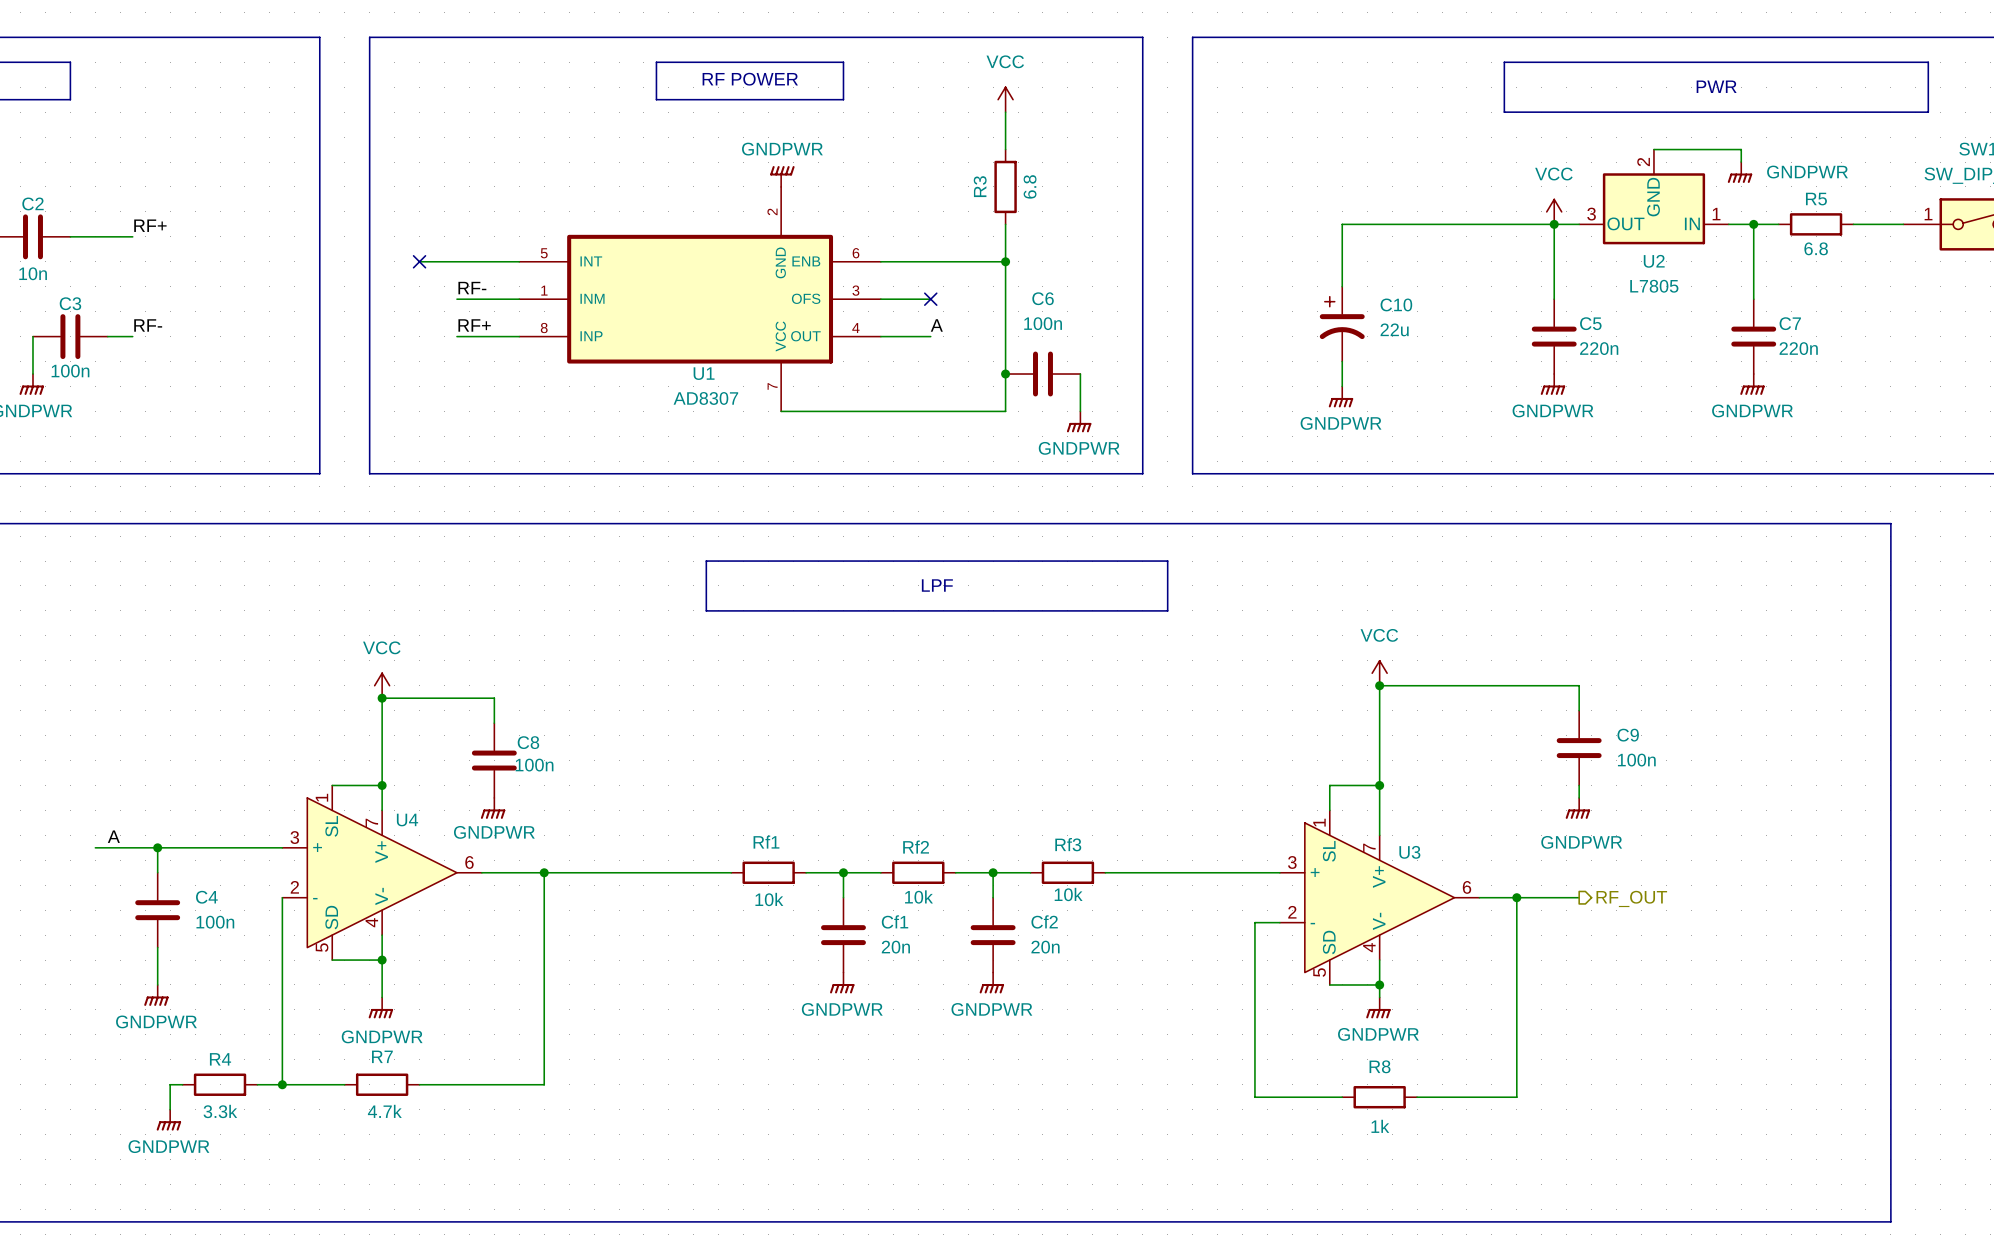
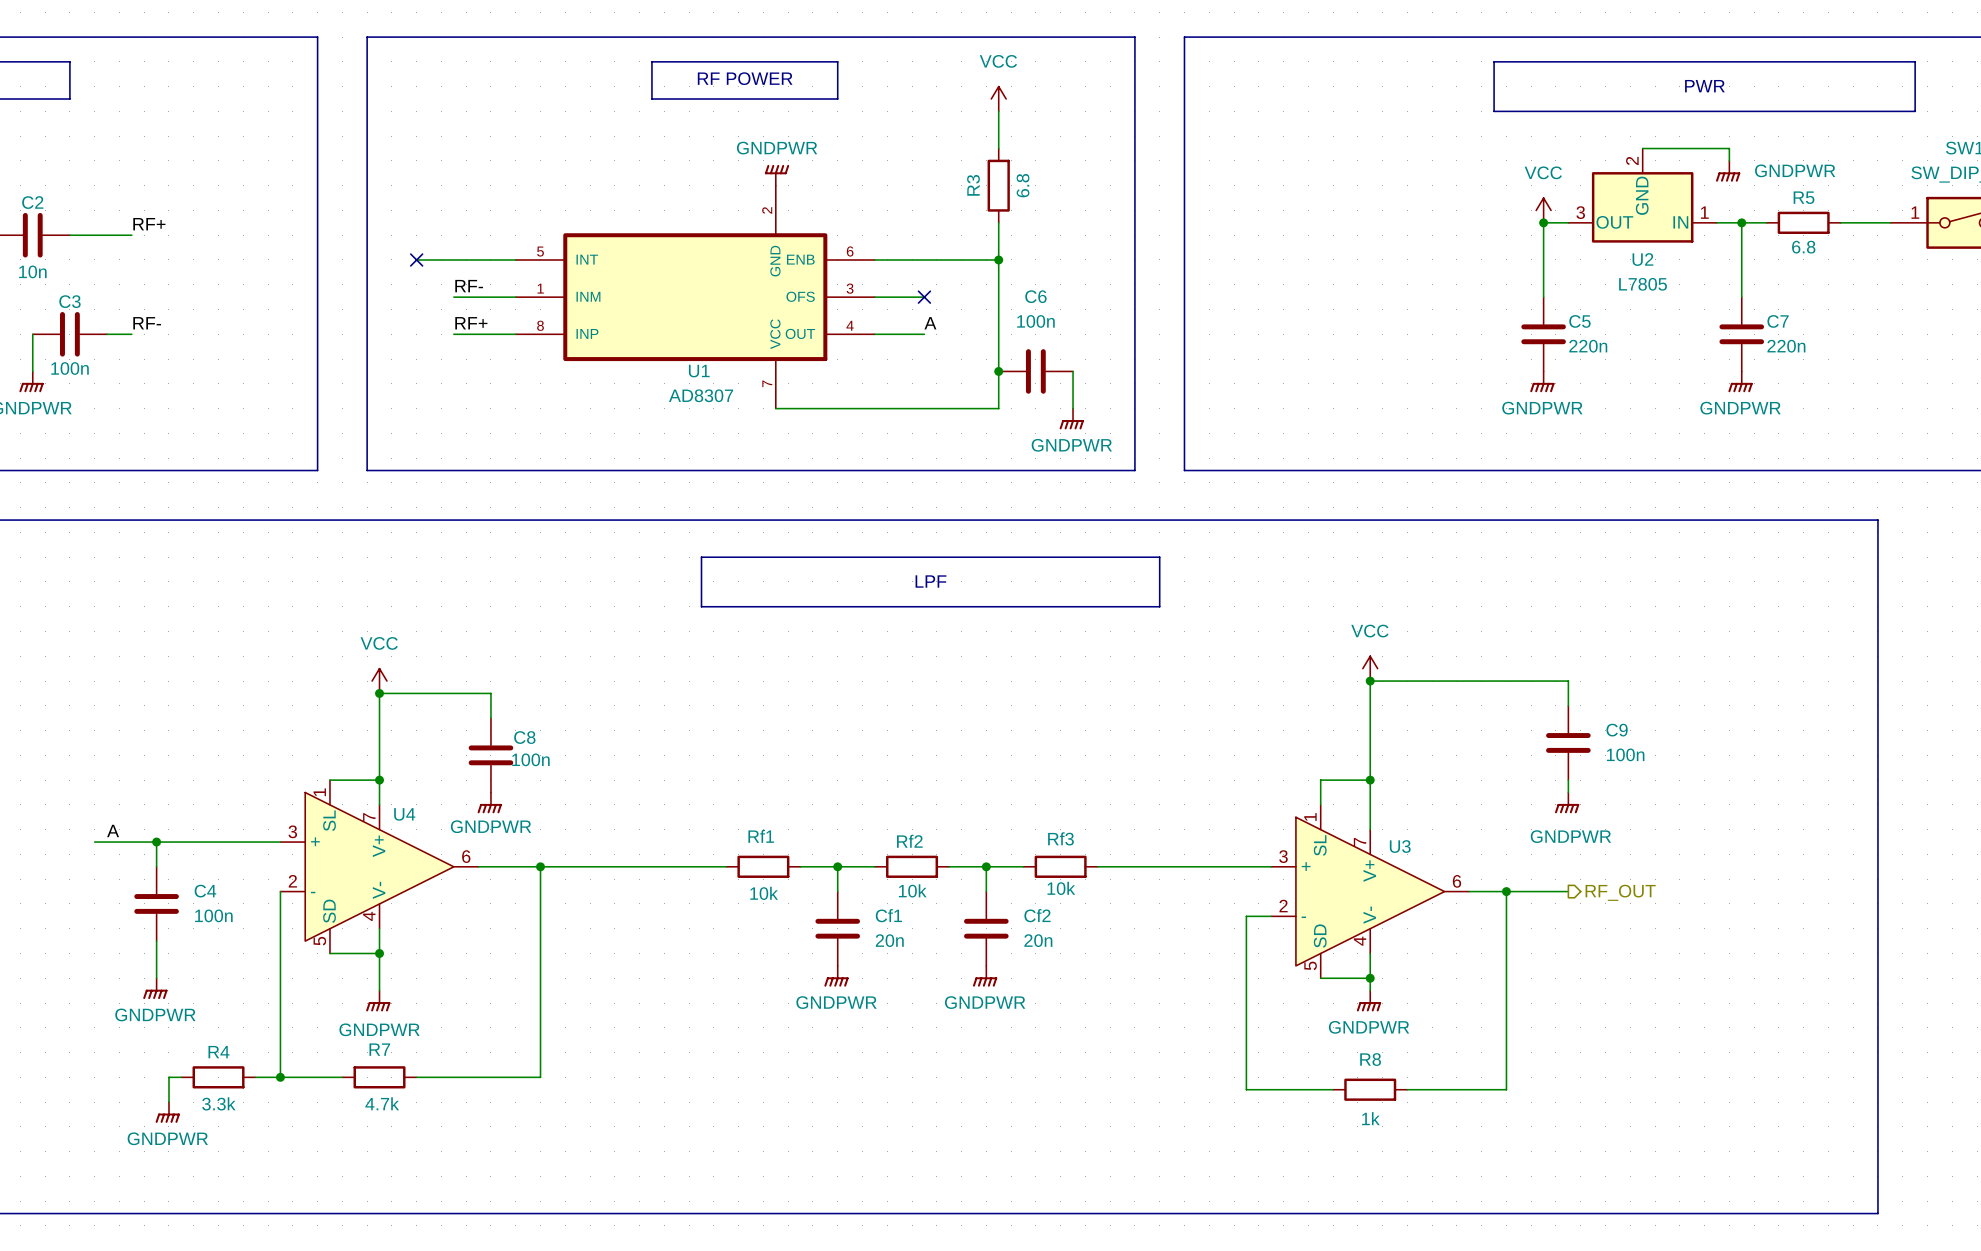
wire: (1554, 224) (1342, 224) (1342, 286) -> none
C10: 22u (1342, 324) -> none
wire: (1342, 361) (1342, 386) -> none
power symbol: GNDPWR (1341, 396) -> none

